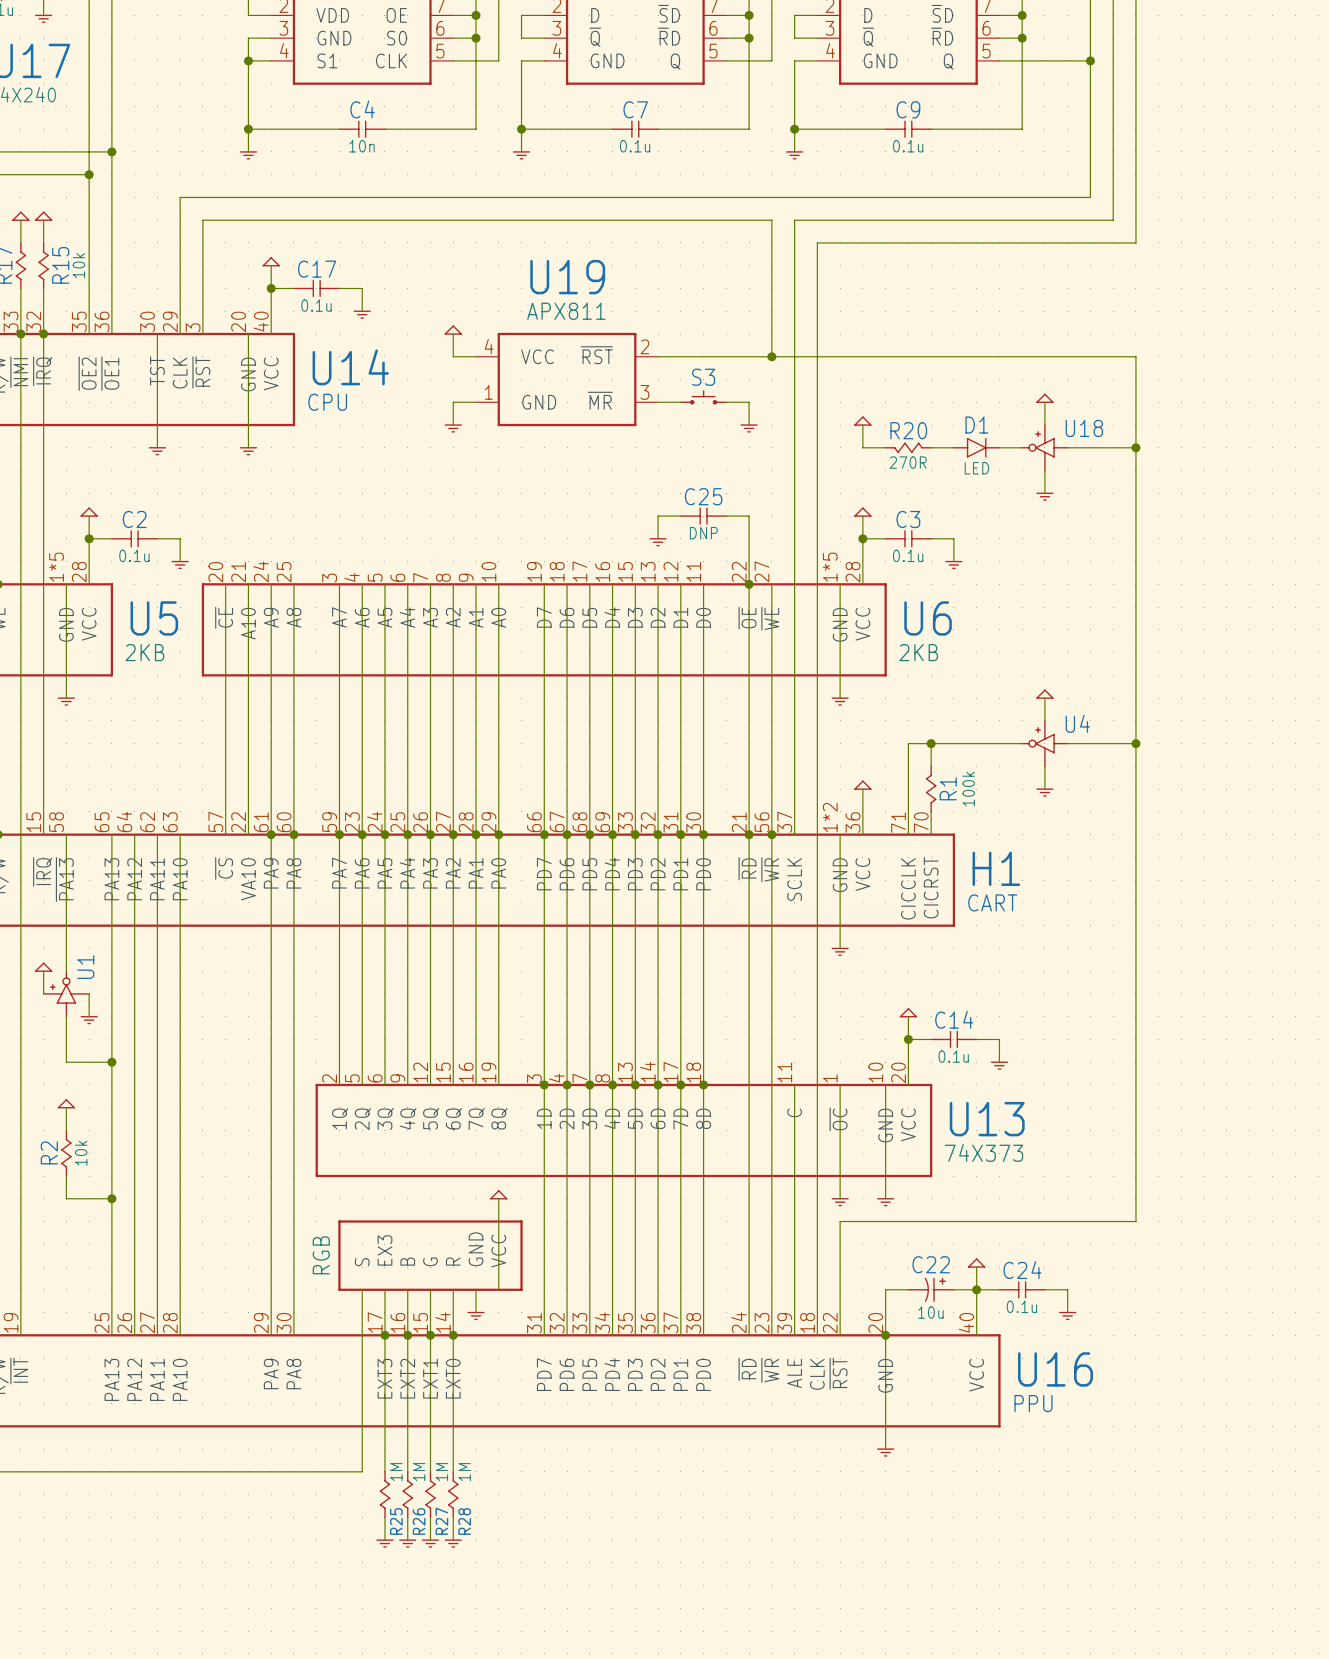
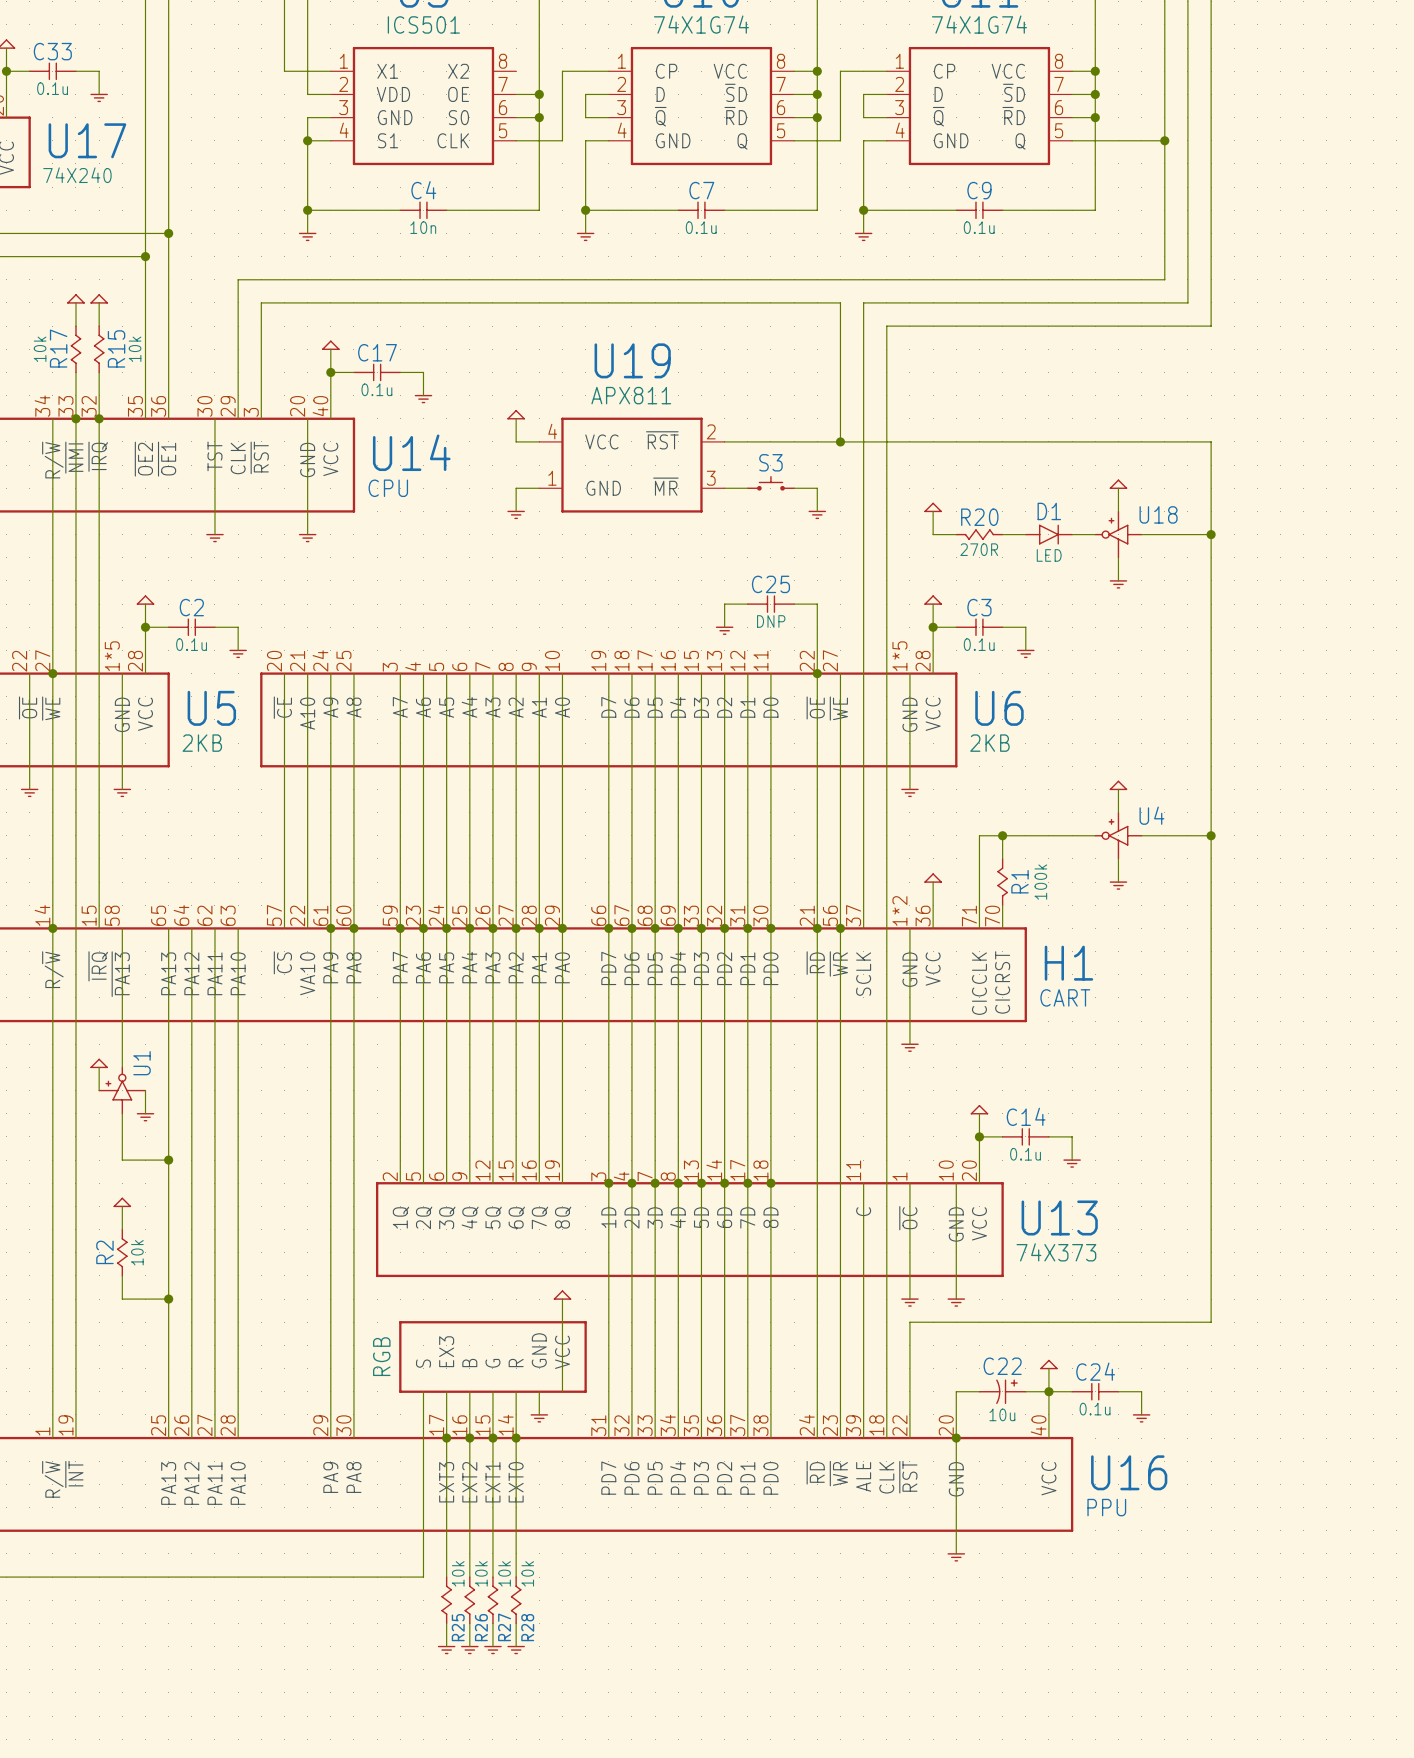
R25 value: 1M (396, 1472) -> 10k (458, 1573)
R26 value: 1M (419, 1472) -> 10k (481, 1573)
R27 value: 1M (441, 1472) -> 10k (504, 1573)
R28 value: 1M (464, 1472) -> 10k (527, 1573)

